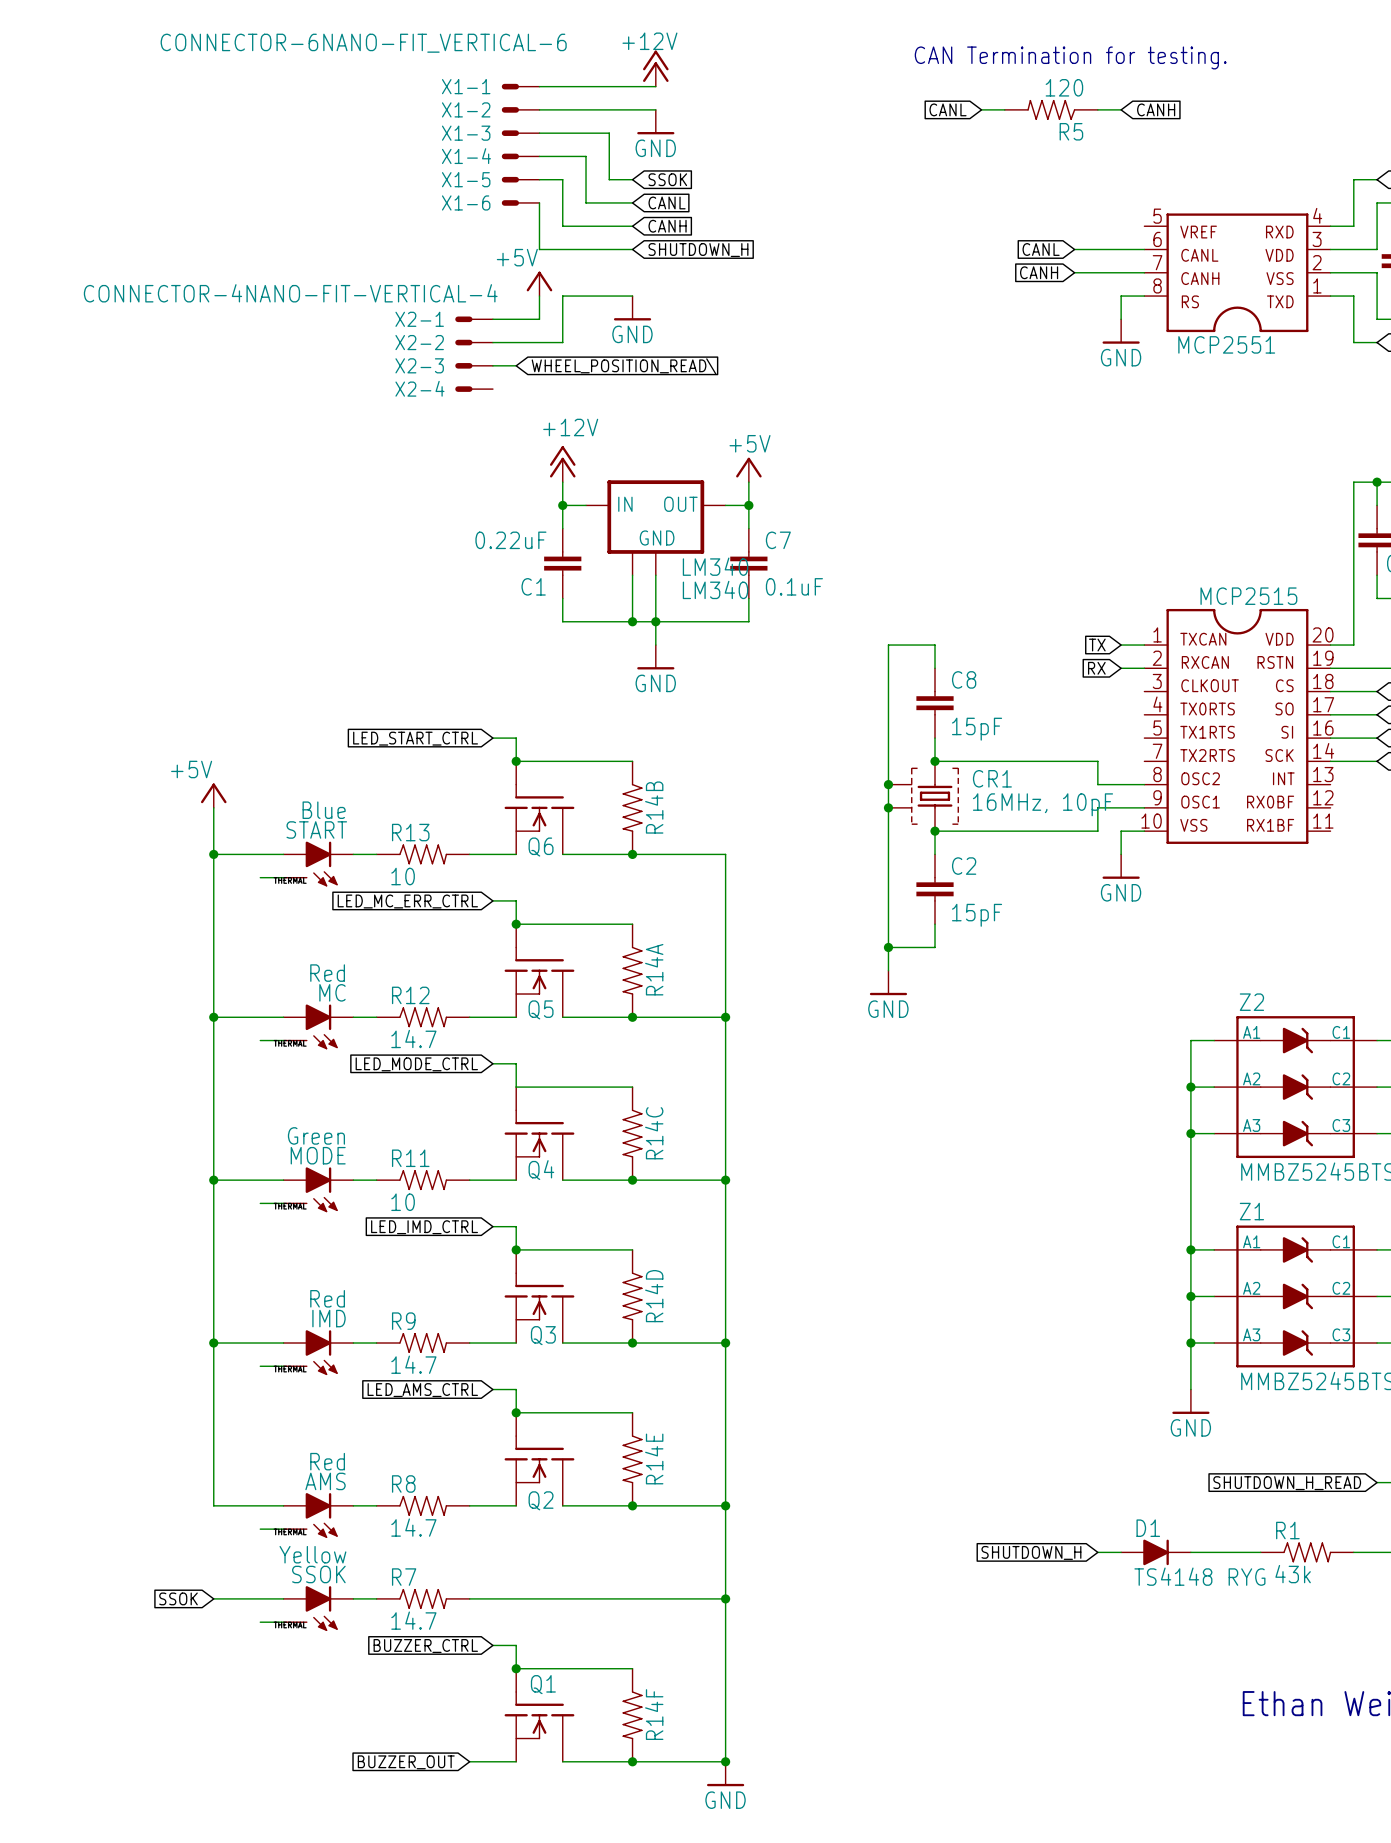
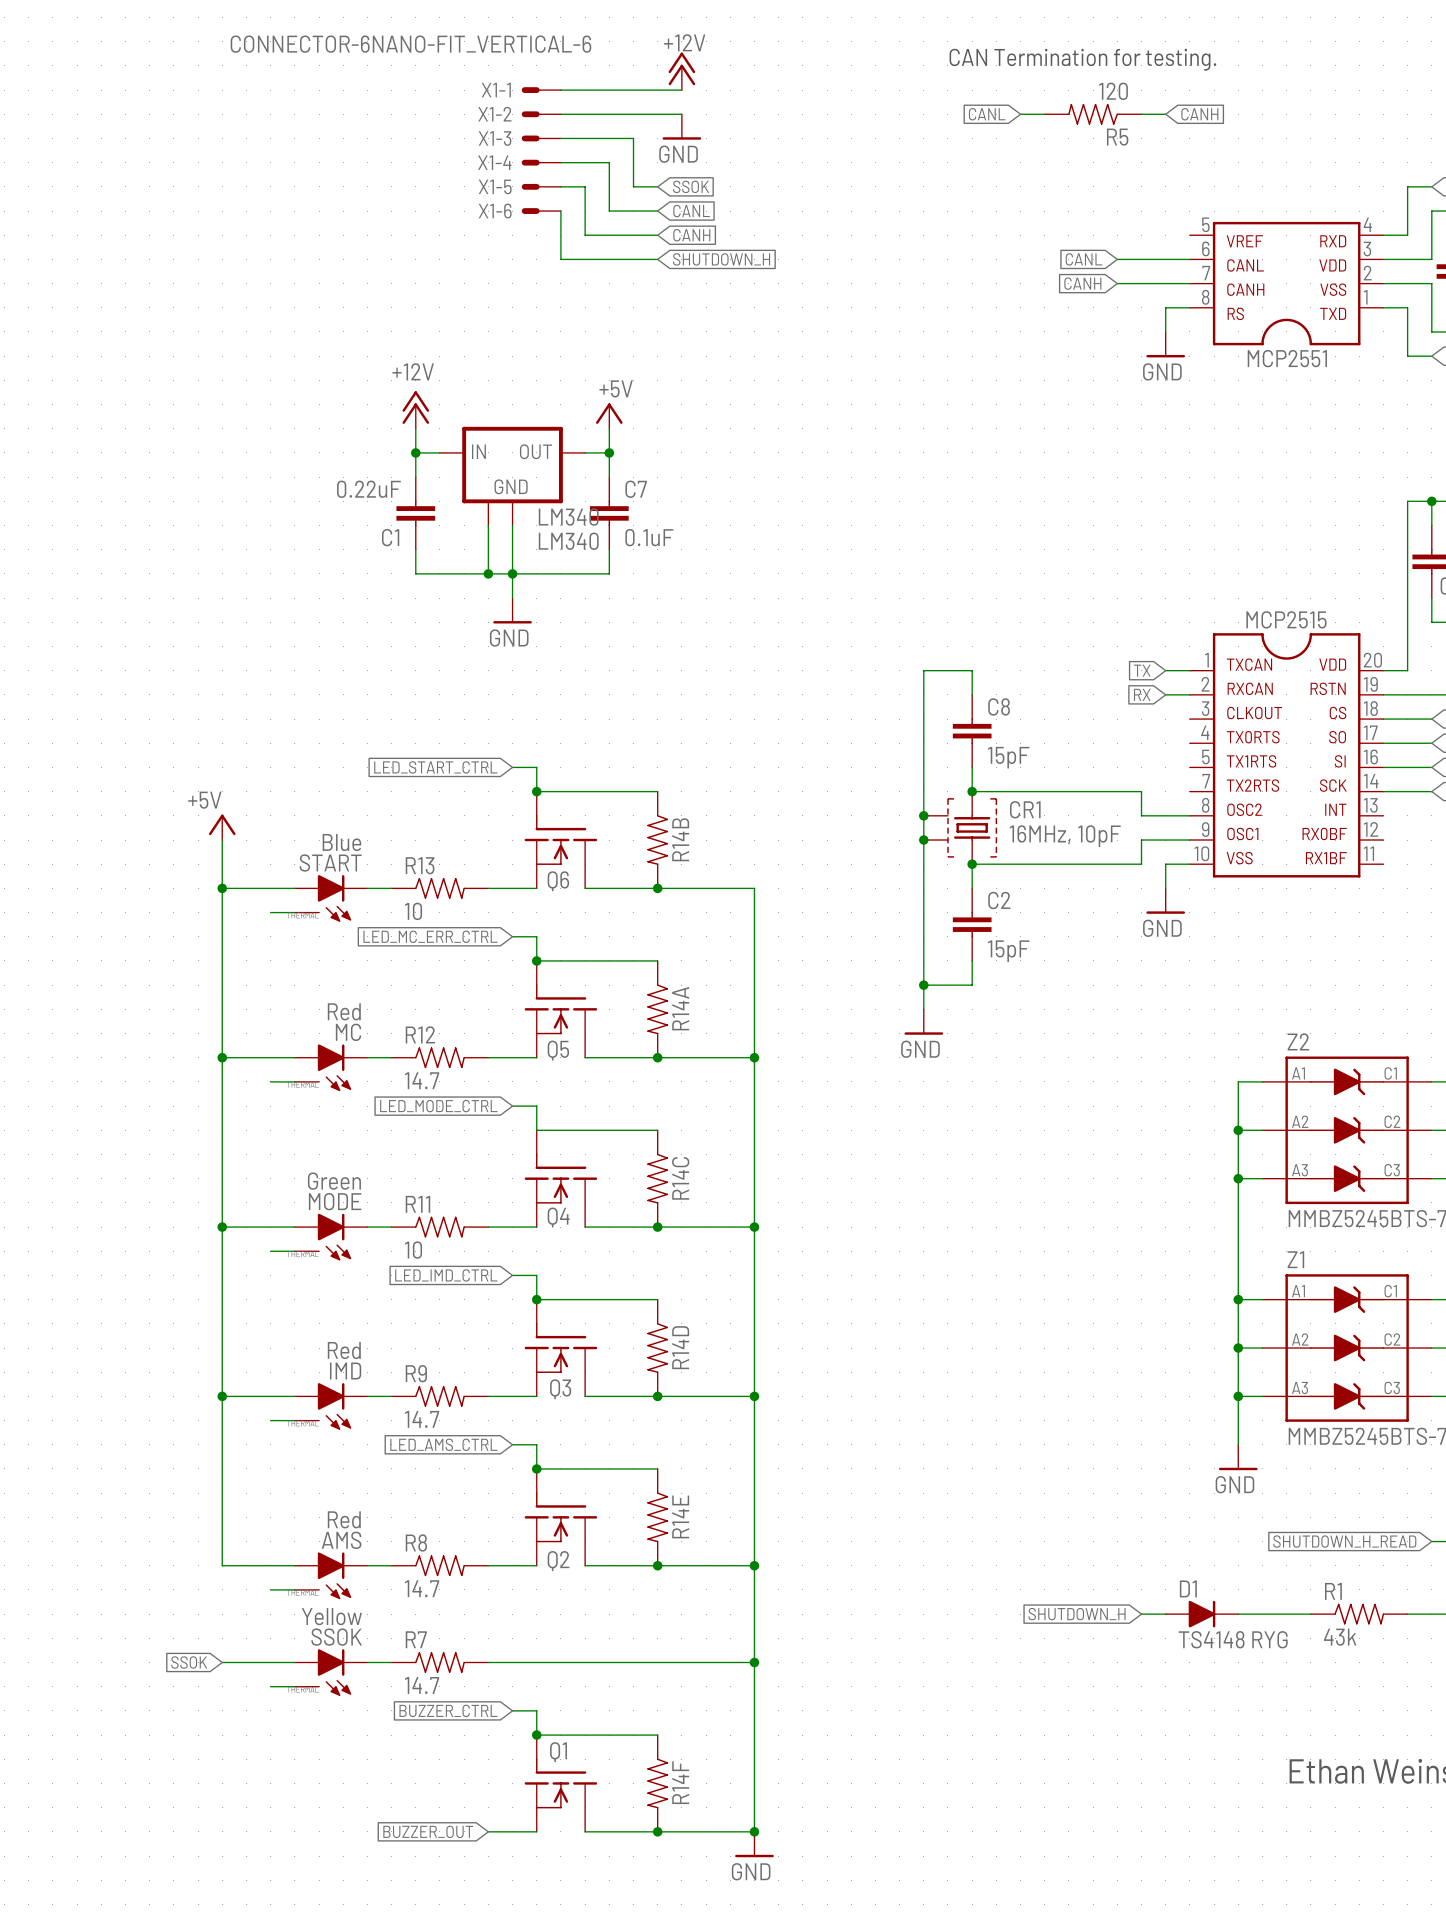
power symbol: +5V (539, 283) -> none
wire: (539, 296) (539, 319) (492, 319) -> none
wire: (632, 296) (562, 296) (562, 342) (492, 342) -> none
power symbol: GND (632, 308) -> none
X2-1: CONNECTOR-4NANO-FIT-VERTICAL-4 (474, 319) -> none
X2-2: (474, 342) -> none
X2-3: (474, 365) -> none
wire: (492, 365) (516, 365) -> none
global label: WHEEL_POSITION_READ\ (624, 366) -> none
X2-4: (474, 389) -> none
power symbol: none -> +5V (609, 416)
junction: none -> (415, 452)
junction: none -> (609, 452)
power symbol position: +12V (562, 464) -> +12V (415, 410)
power symbol: +5V (748, 469) -> none
wire: (562, 482) (562, 528) -> (415, 428) (415, 477)
wire: (748, 482) (748, 528) -> (609, 428) (609, 477)
wire: (562, 505) (586, 505) -> (415, 452) (439, 452)
junction: (562, 505) -> none
wire: (725, 505) (748, 505) -> (585, 452) (609, 452)
junction: (748, 505) -> none
LM340 position: (655, 527) -> (512, 476)
junction: none -> (488, 573)
junction: none -> (512, 573)
C1 position: (562, 563) -> (415, 513)
C7 position: (748, 563) -> (609, 513)
wire: (632, 575) (632, 621) -> (488, 525) (488, 573)
wire: (655, 575) (655, 645) -> (512, 525) (512, 598)
power symbol: none -> GND (512, 610)
wire: (562, 598) (562, 621) (748, 621) (748, 598) -> (415, 549) (415, 573) (609, 573) (609, 549)
junction: (632, 621) -> none
junction: (655, 621) -> none
power symbol: GND (655, 657) -> none

